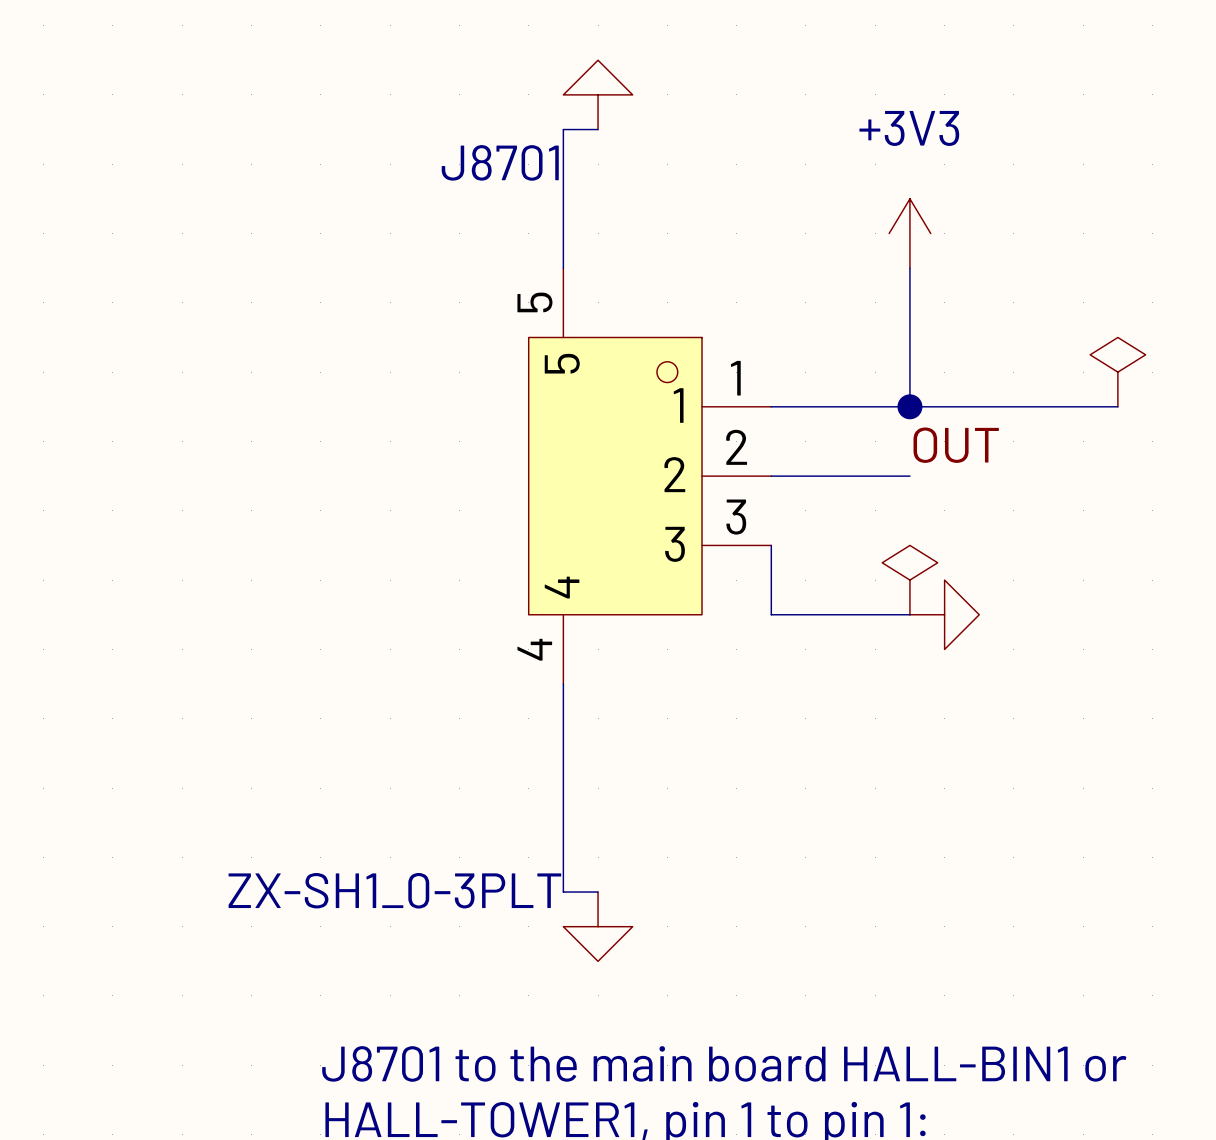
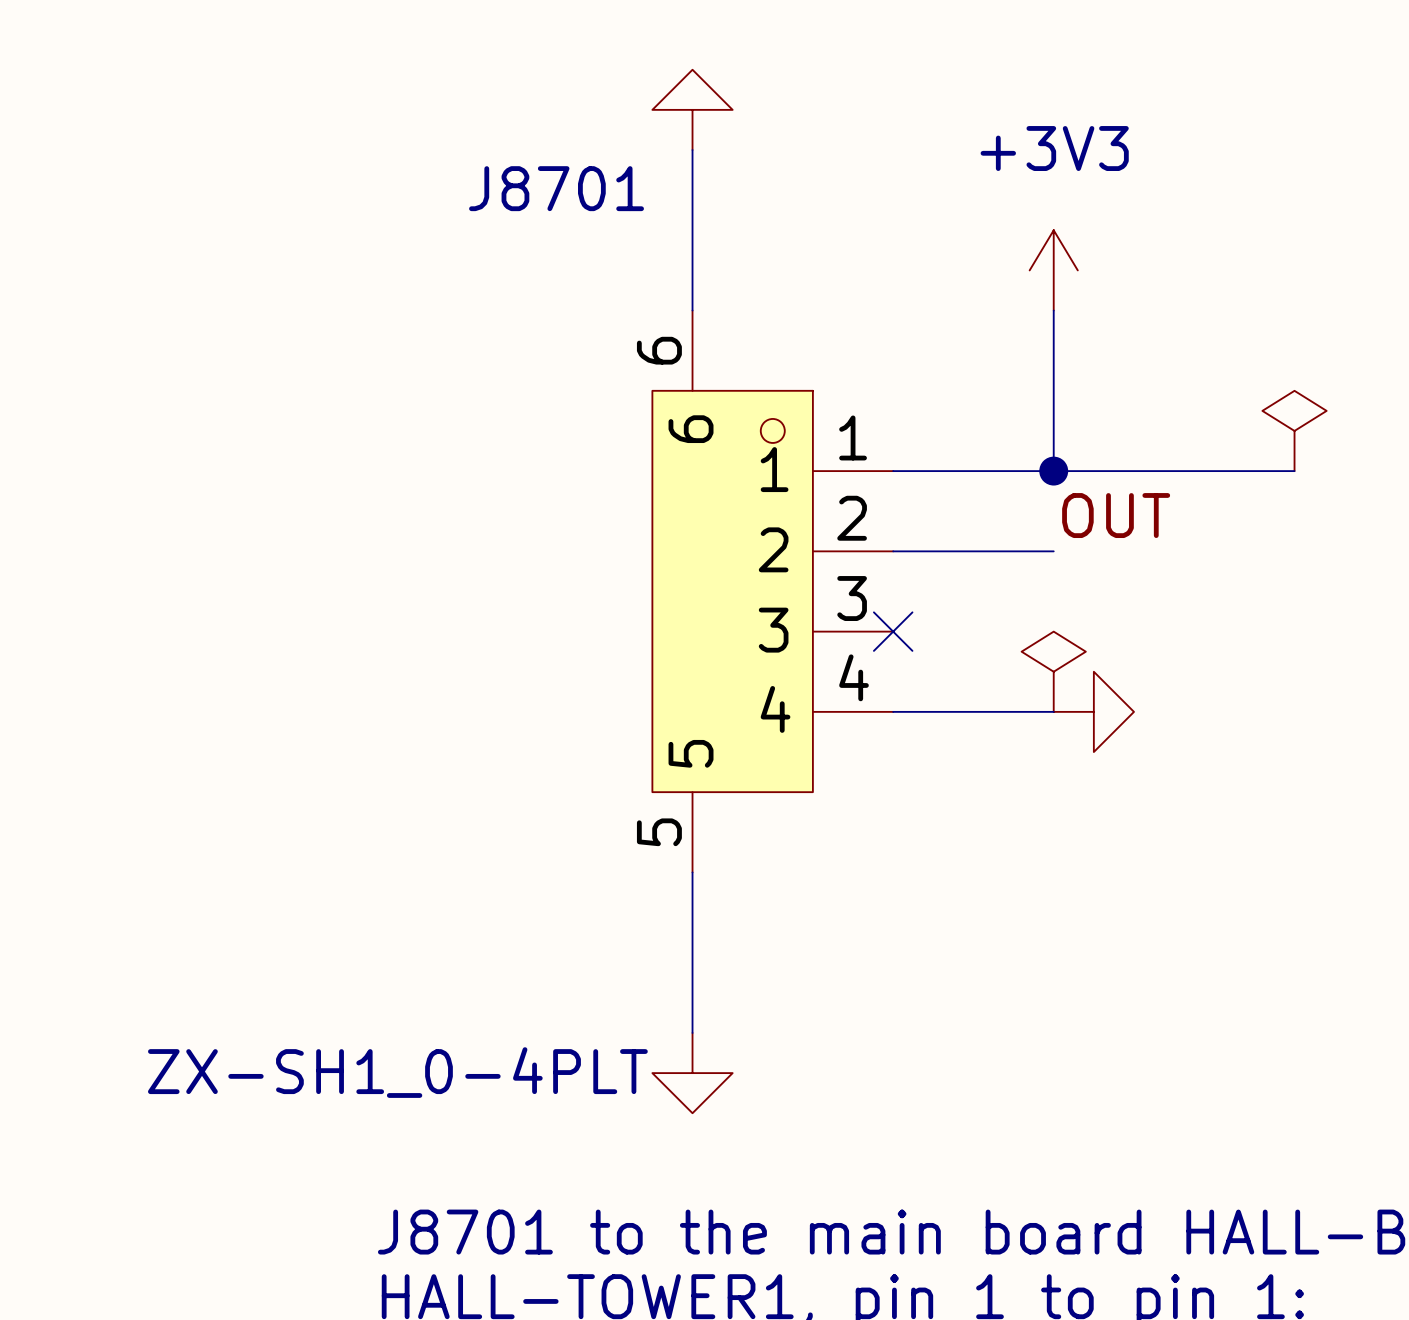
wire: (598, 129) (563, 129) (563, 268) -> (692, 150) (692, 310)
J8701 symbol: [528, 268, 772, 685] -> [652, 310, 894, 873]
wire: (771, 545) (771, 614) -> none
no-connect mark: none -> (893, 631)
wire: (563, 684) (563, 892) (598, 892) -> (692, 872) (692, 1032)
J8701 value: ZX-SH1_0-3PLT (394, 890) -> ZX-SH1_0-4PLT (397, 1072)

